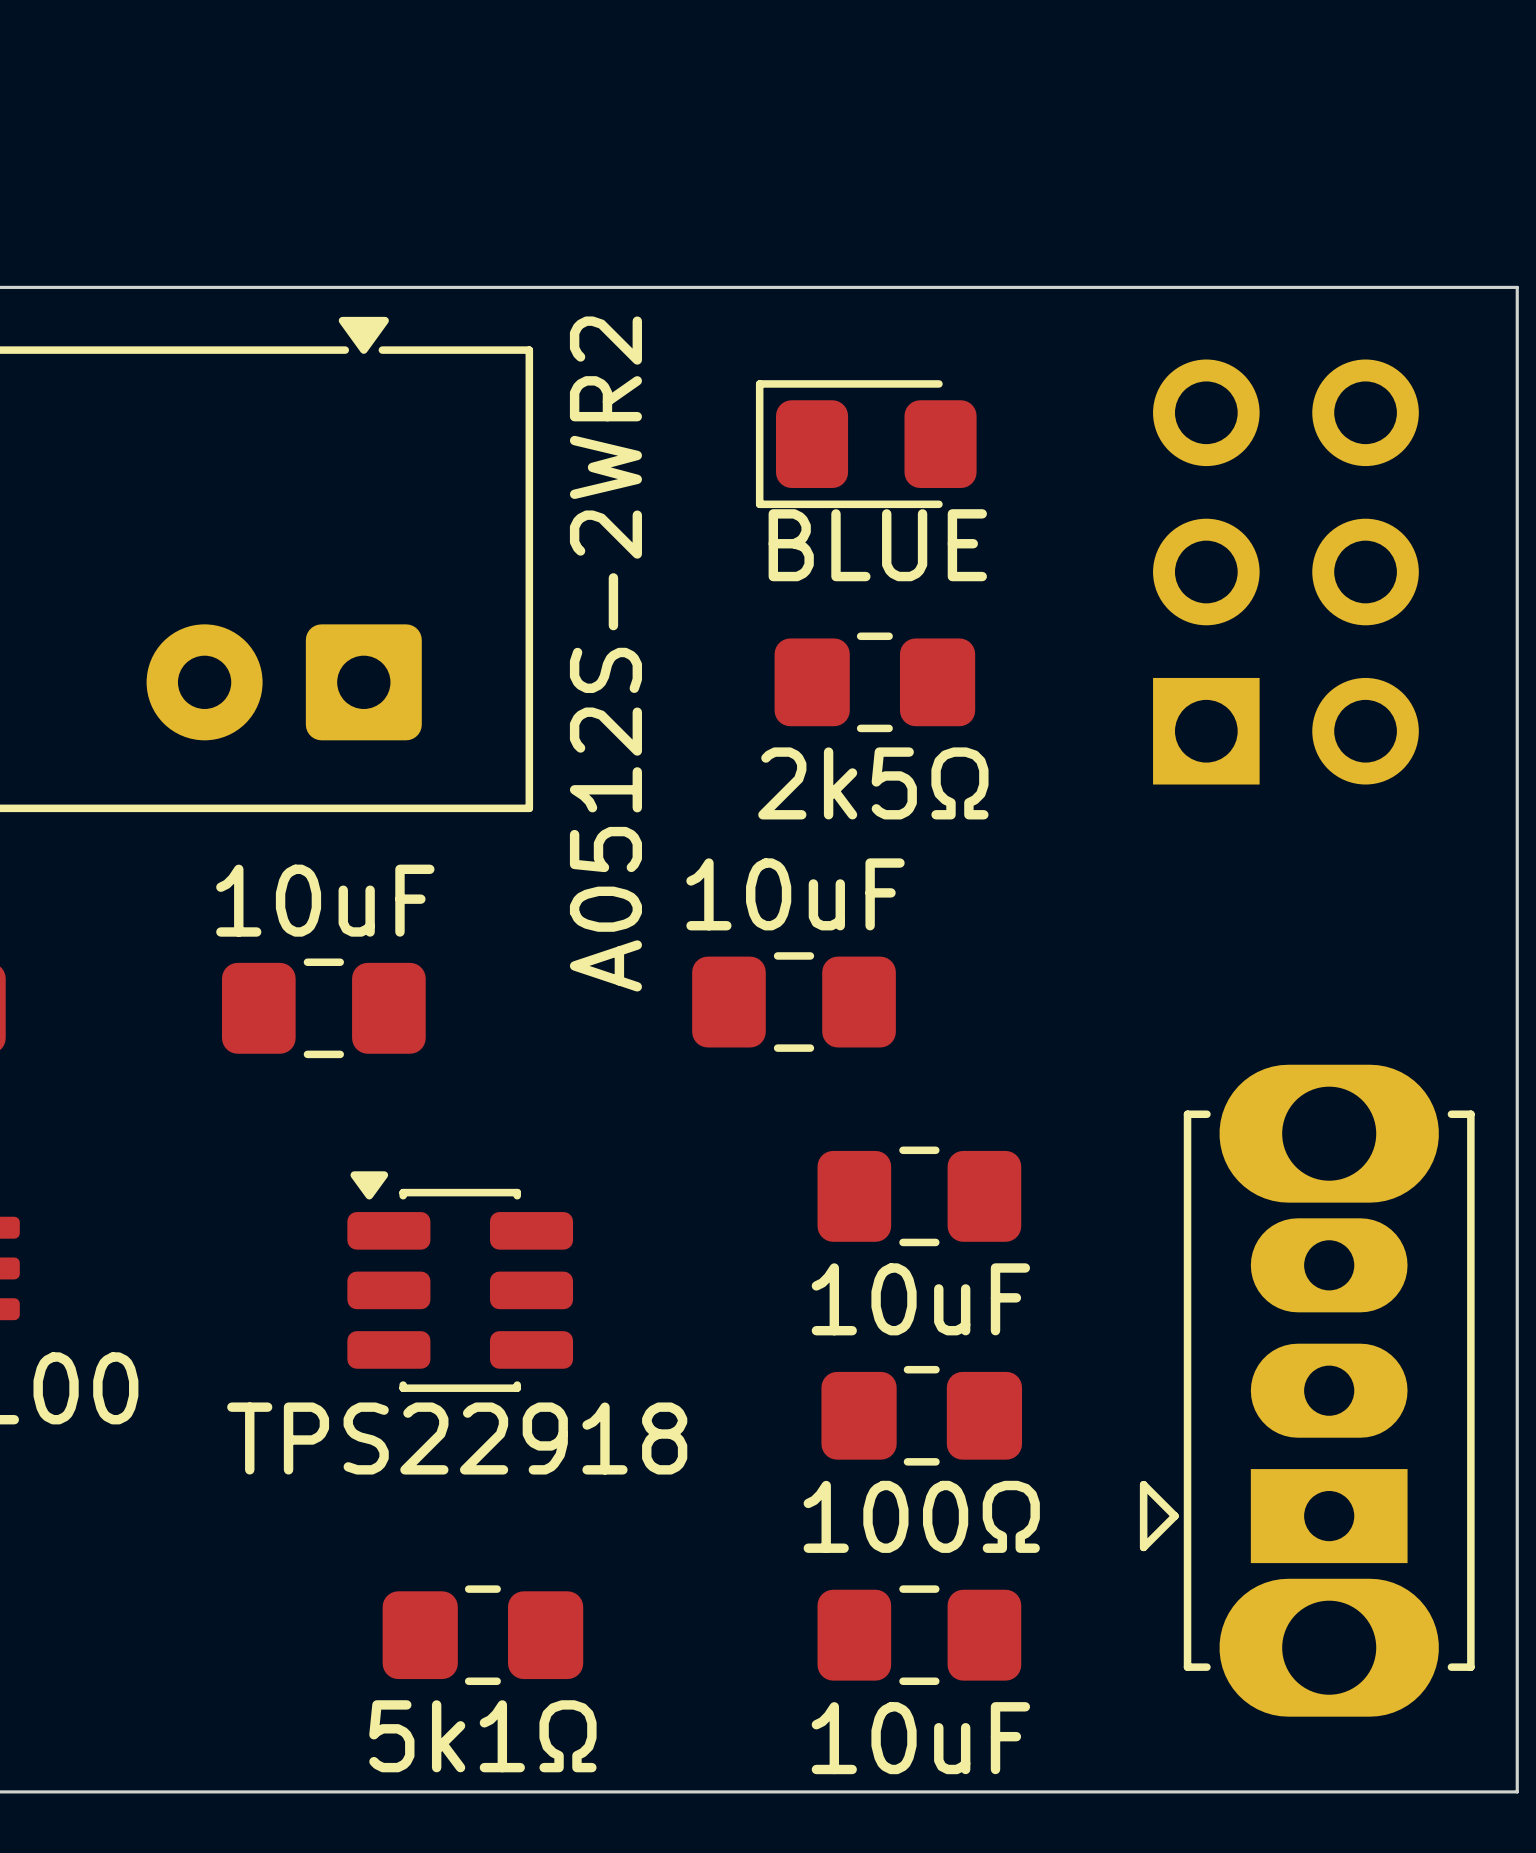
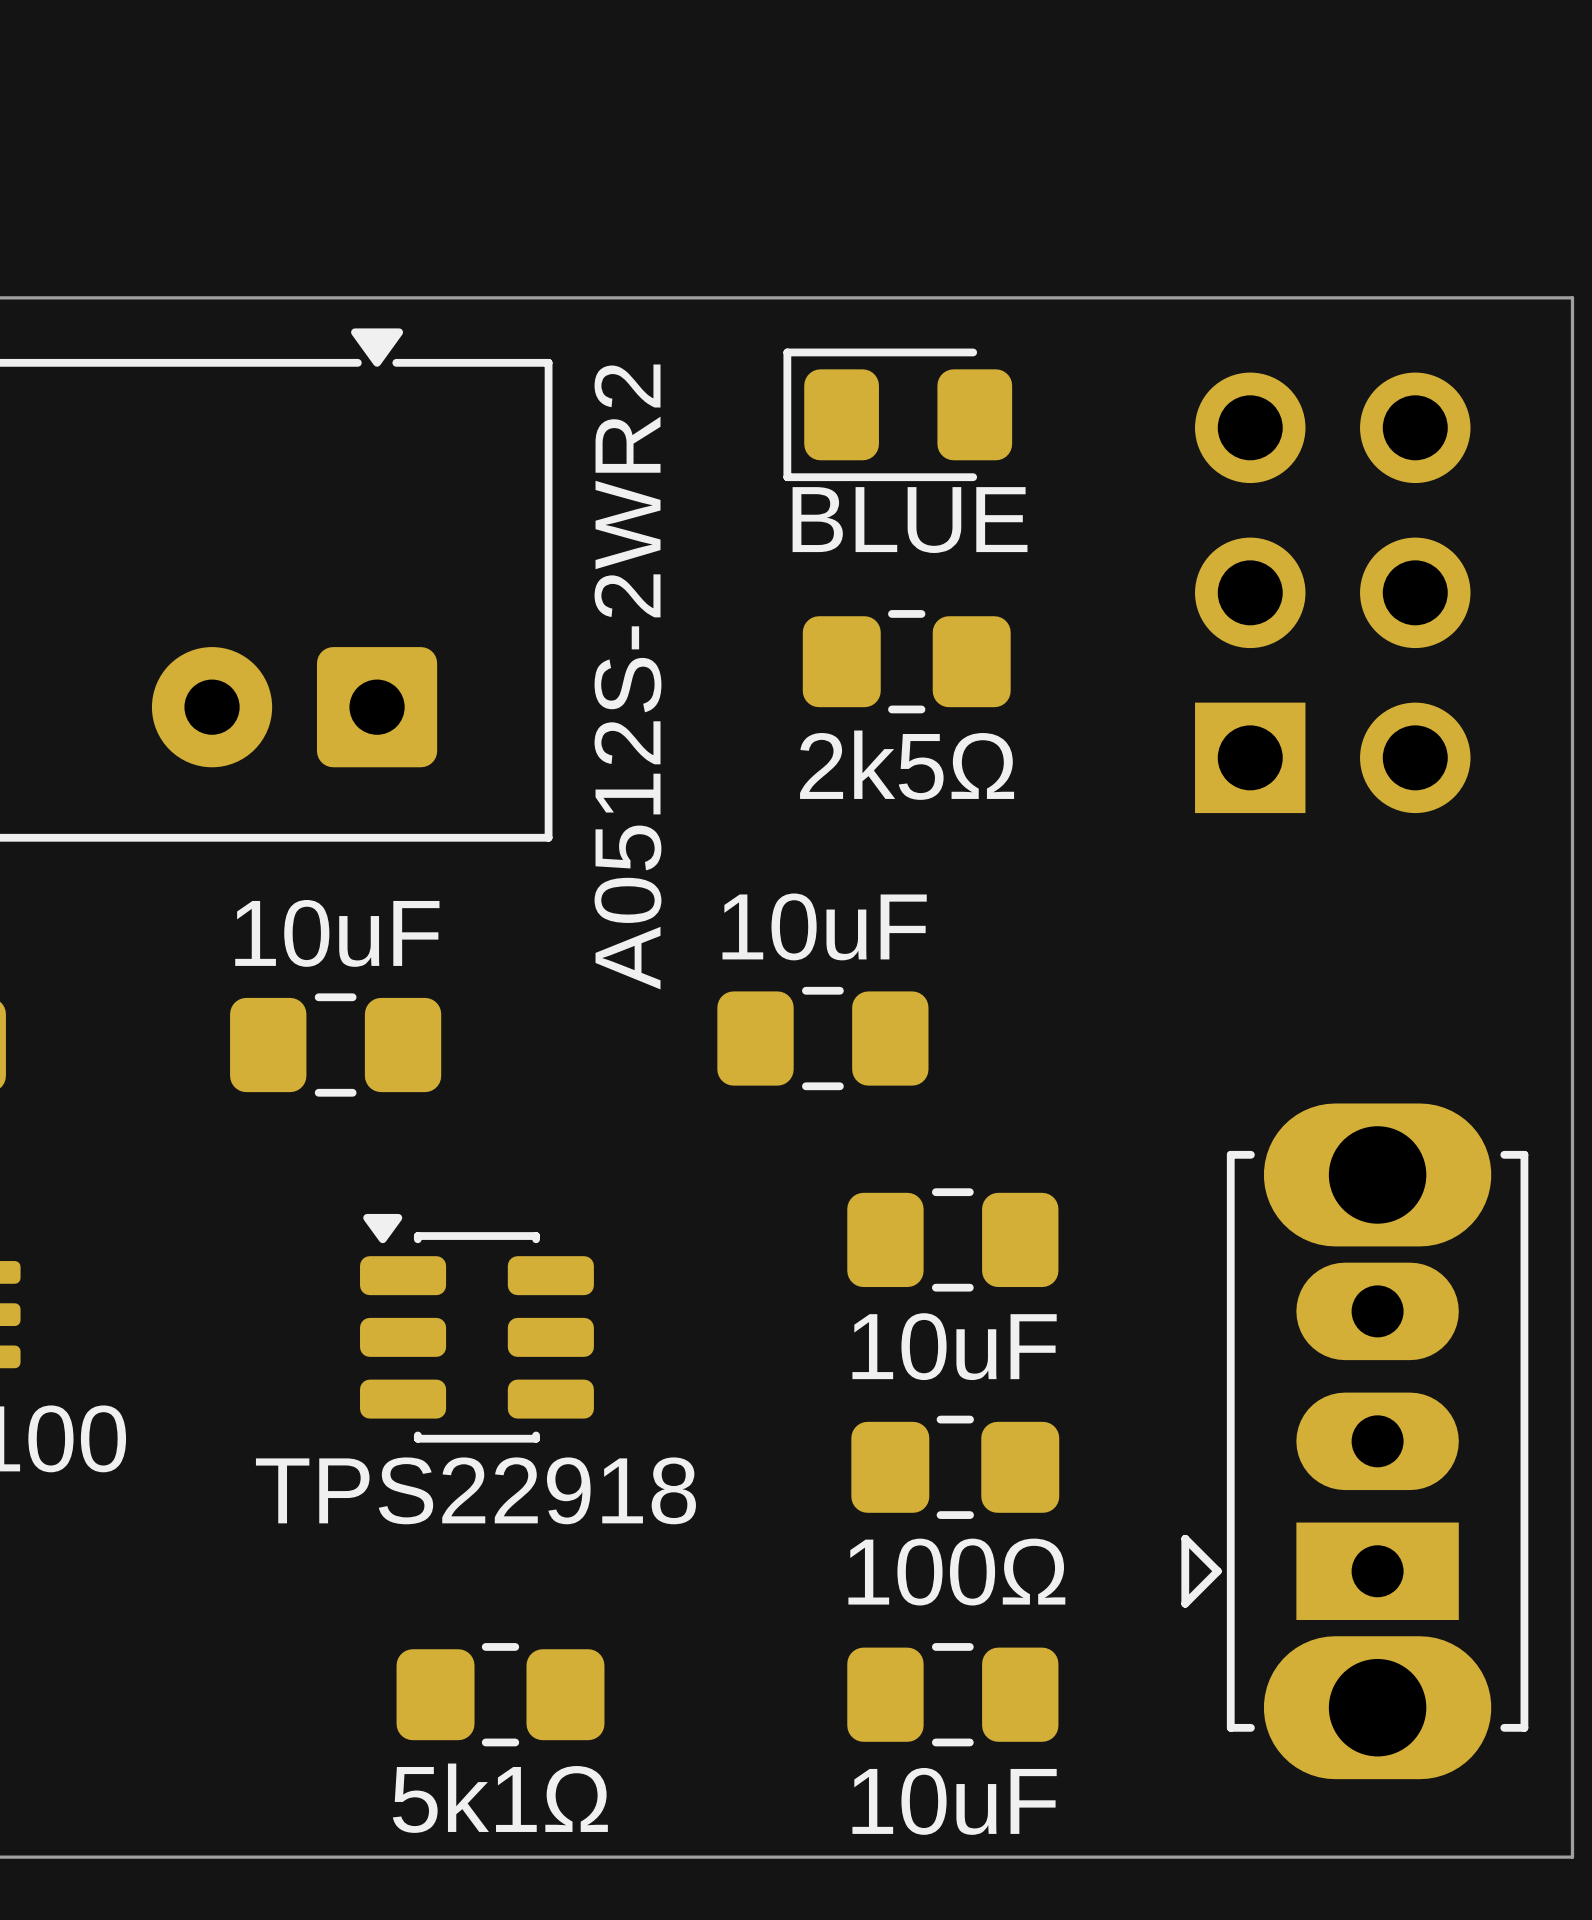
part position: (866, 444) -> (897, 414)
part position: (874, 682) -> (906, 661)

